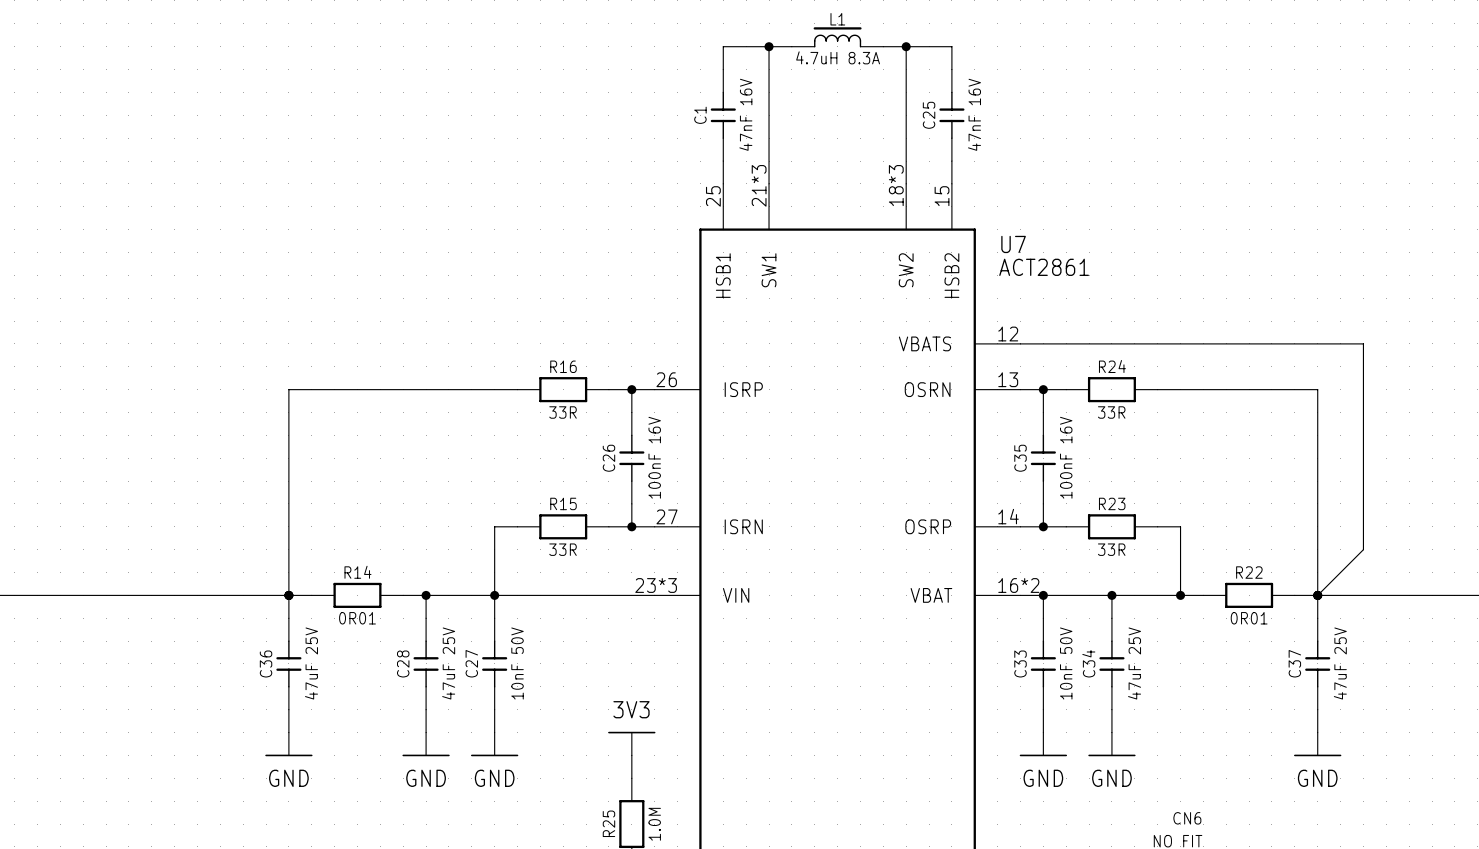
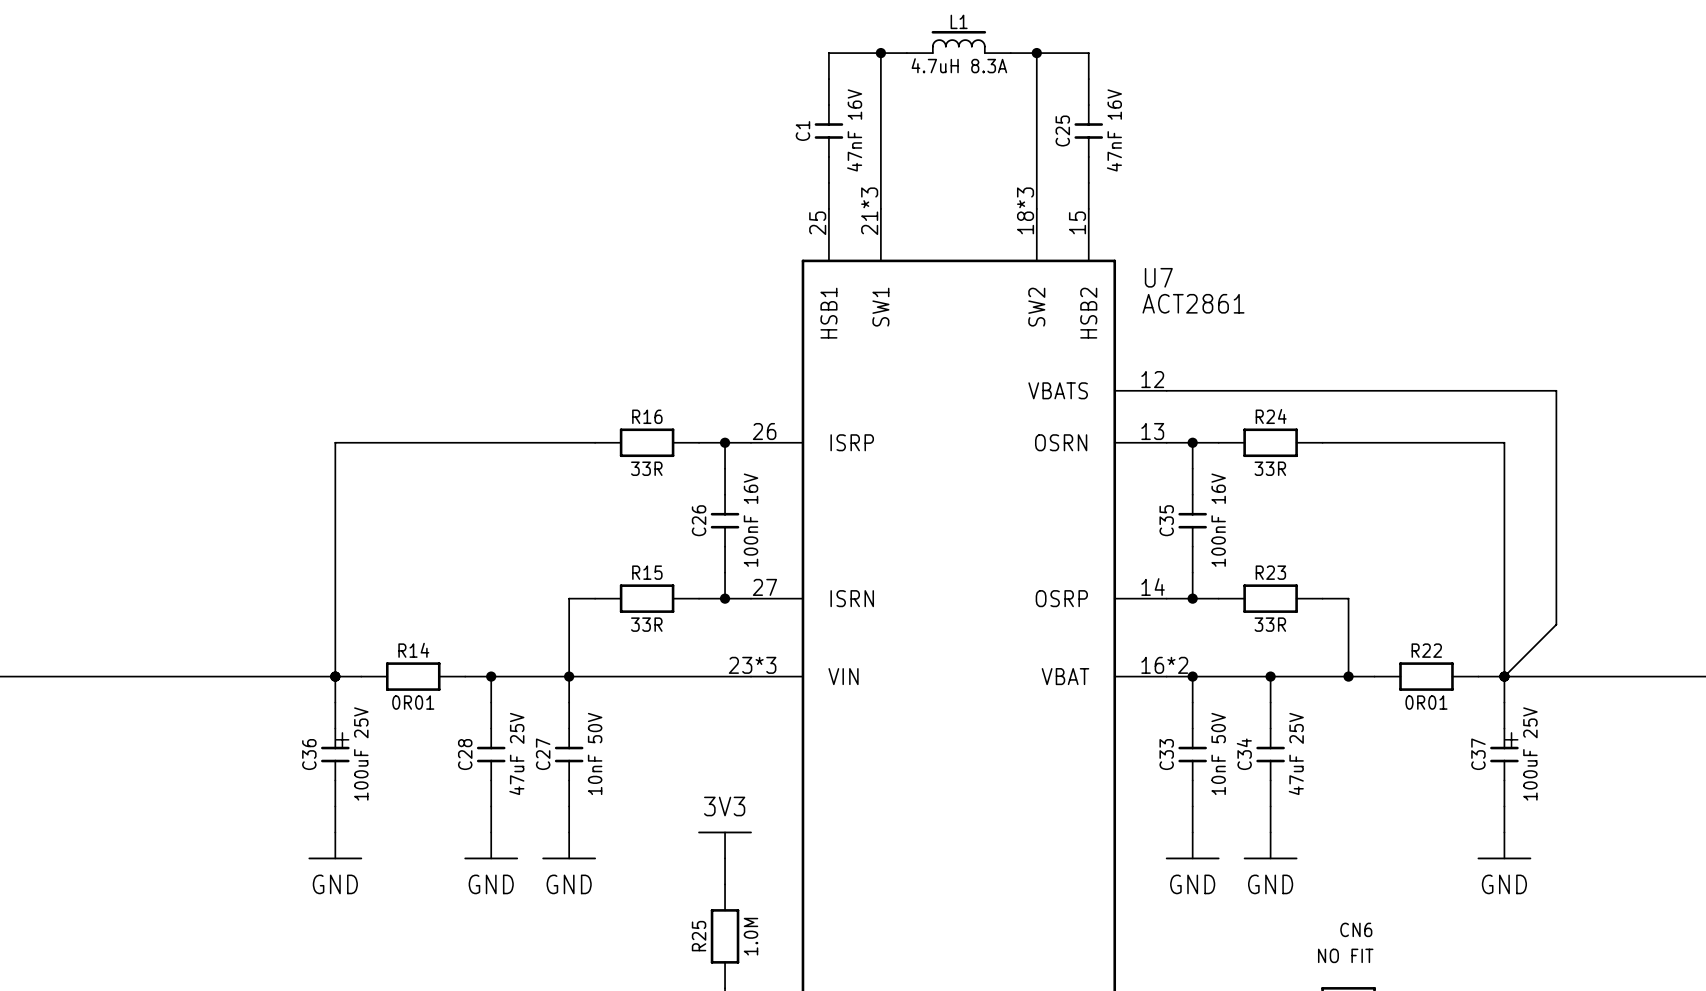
C36 text: none -> + (342, 739)
C37 text: none -> + (1511, 739)
C36 value: 47uF 25V (311, 663) -> 100uF 25V (361, 753)
C37 value: 47uF 25V (1340, 663) -> 100uF 25V (1530, 753)

